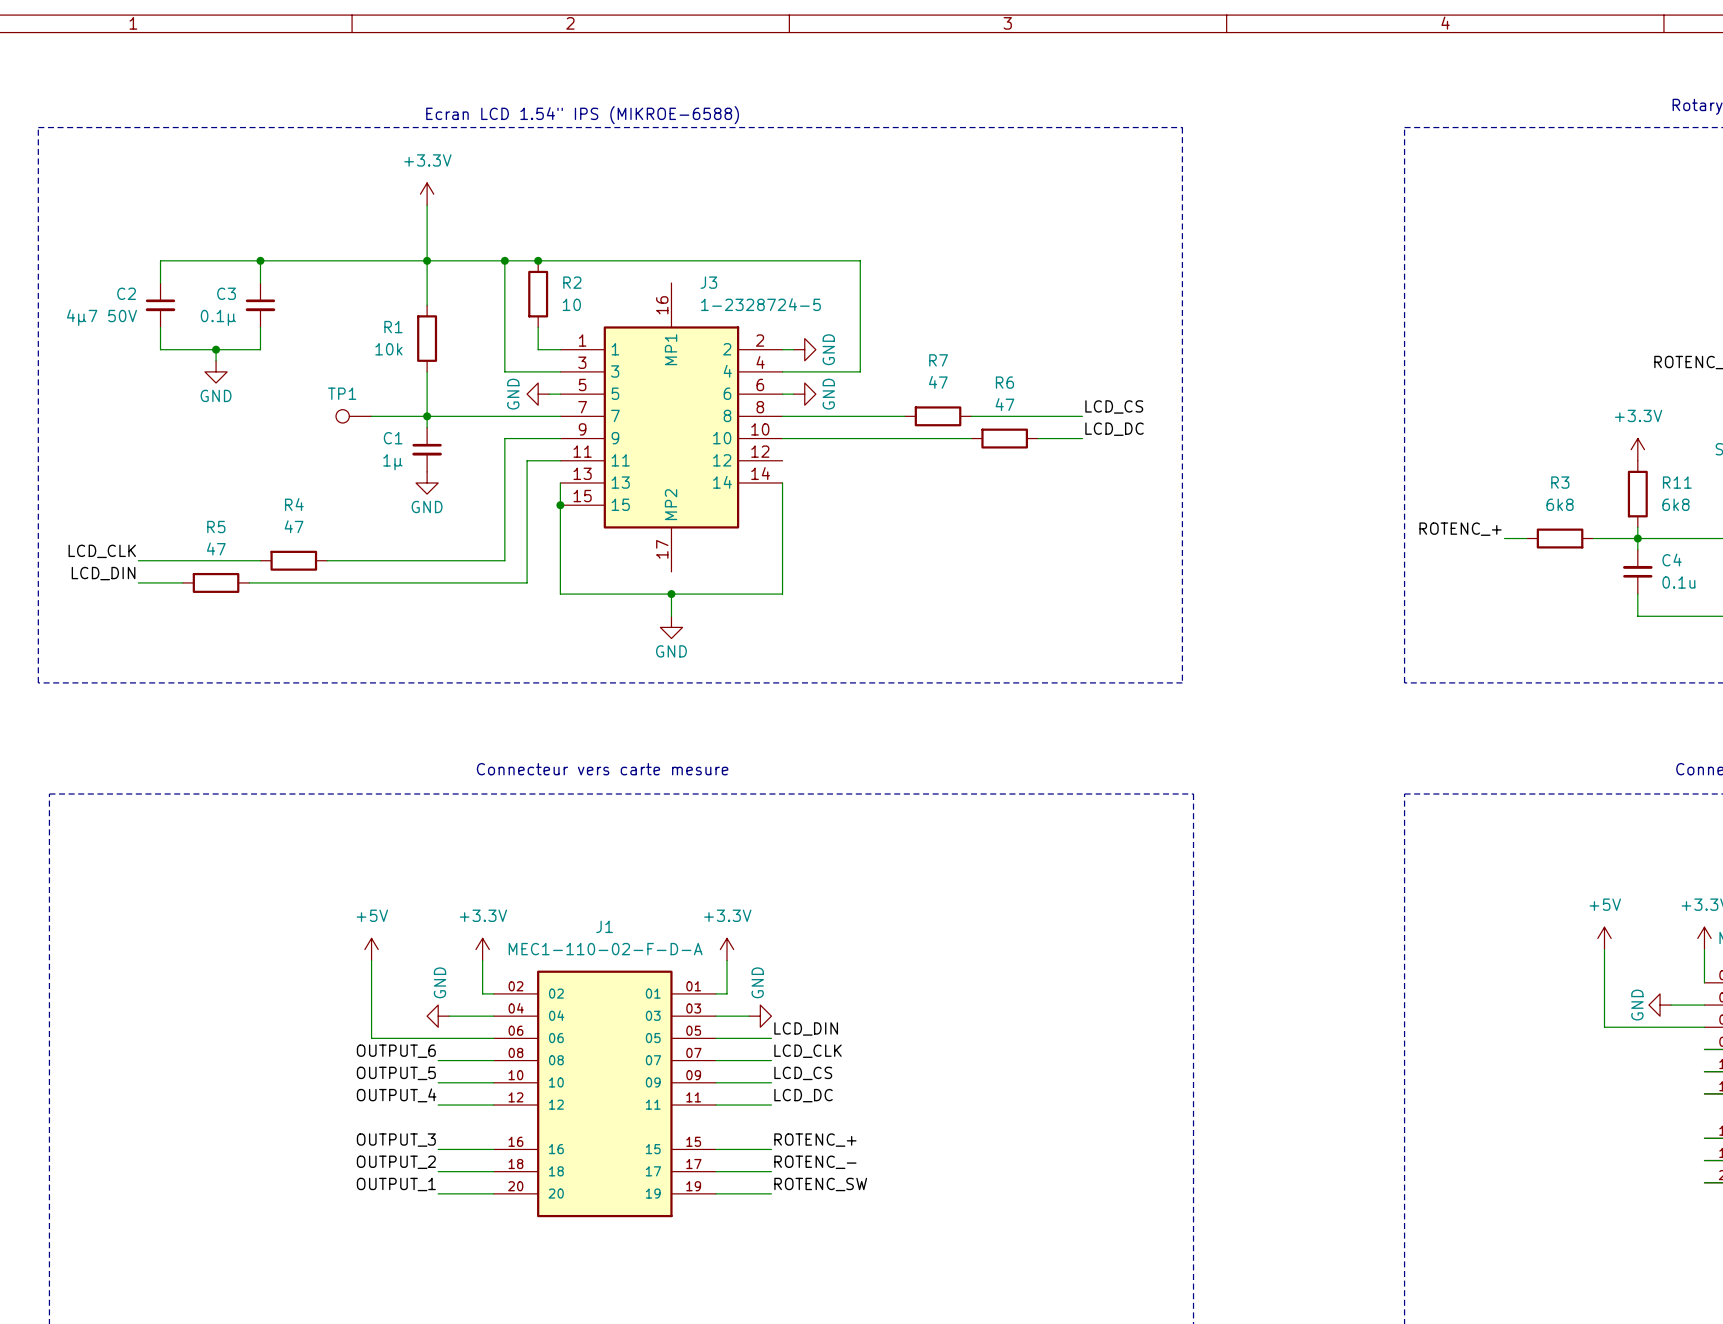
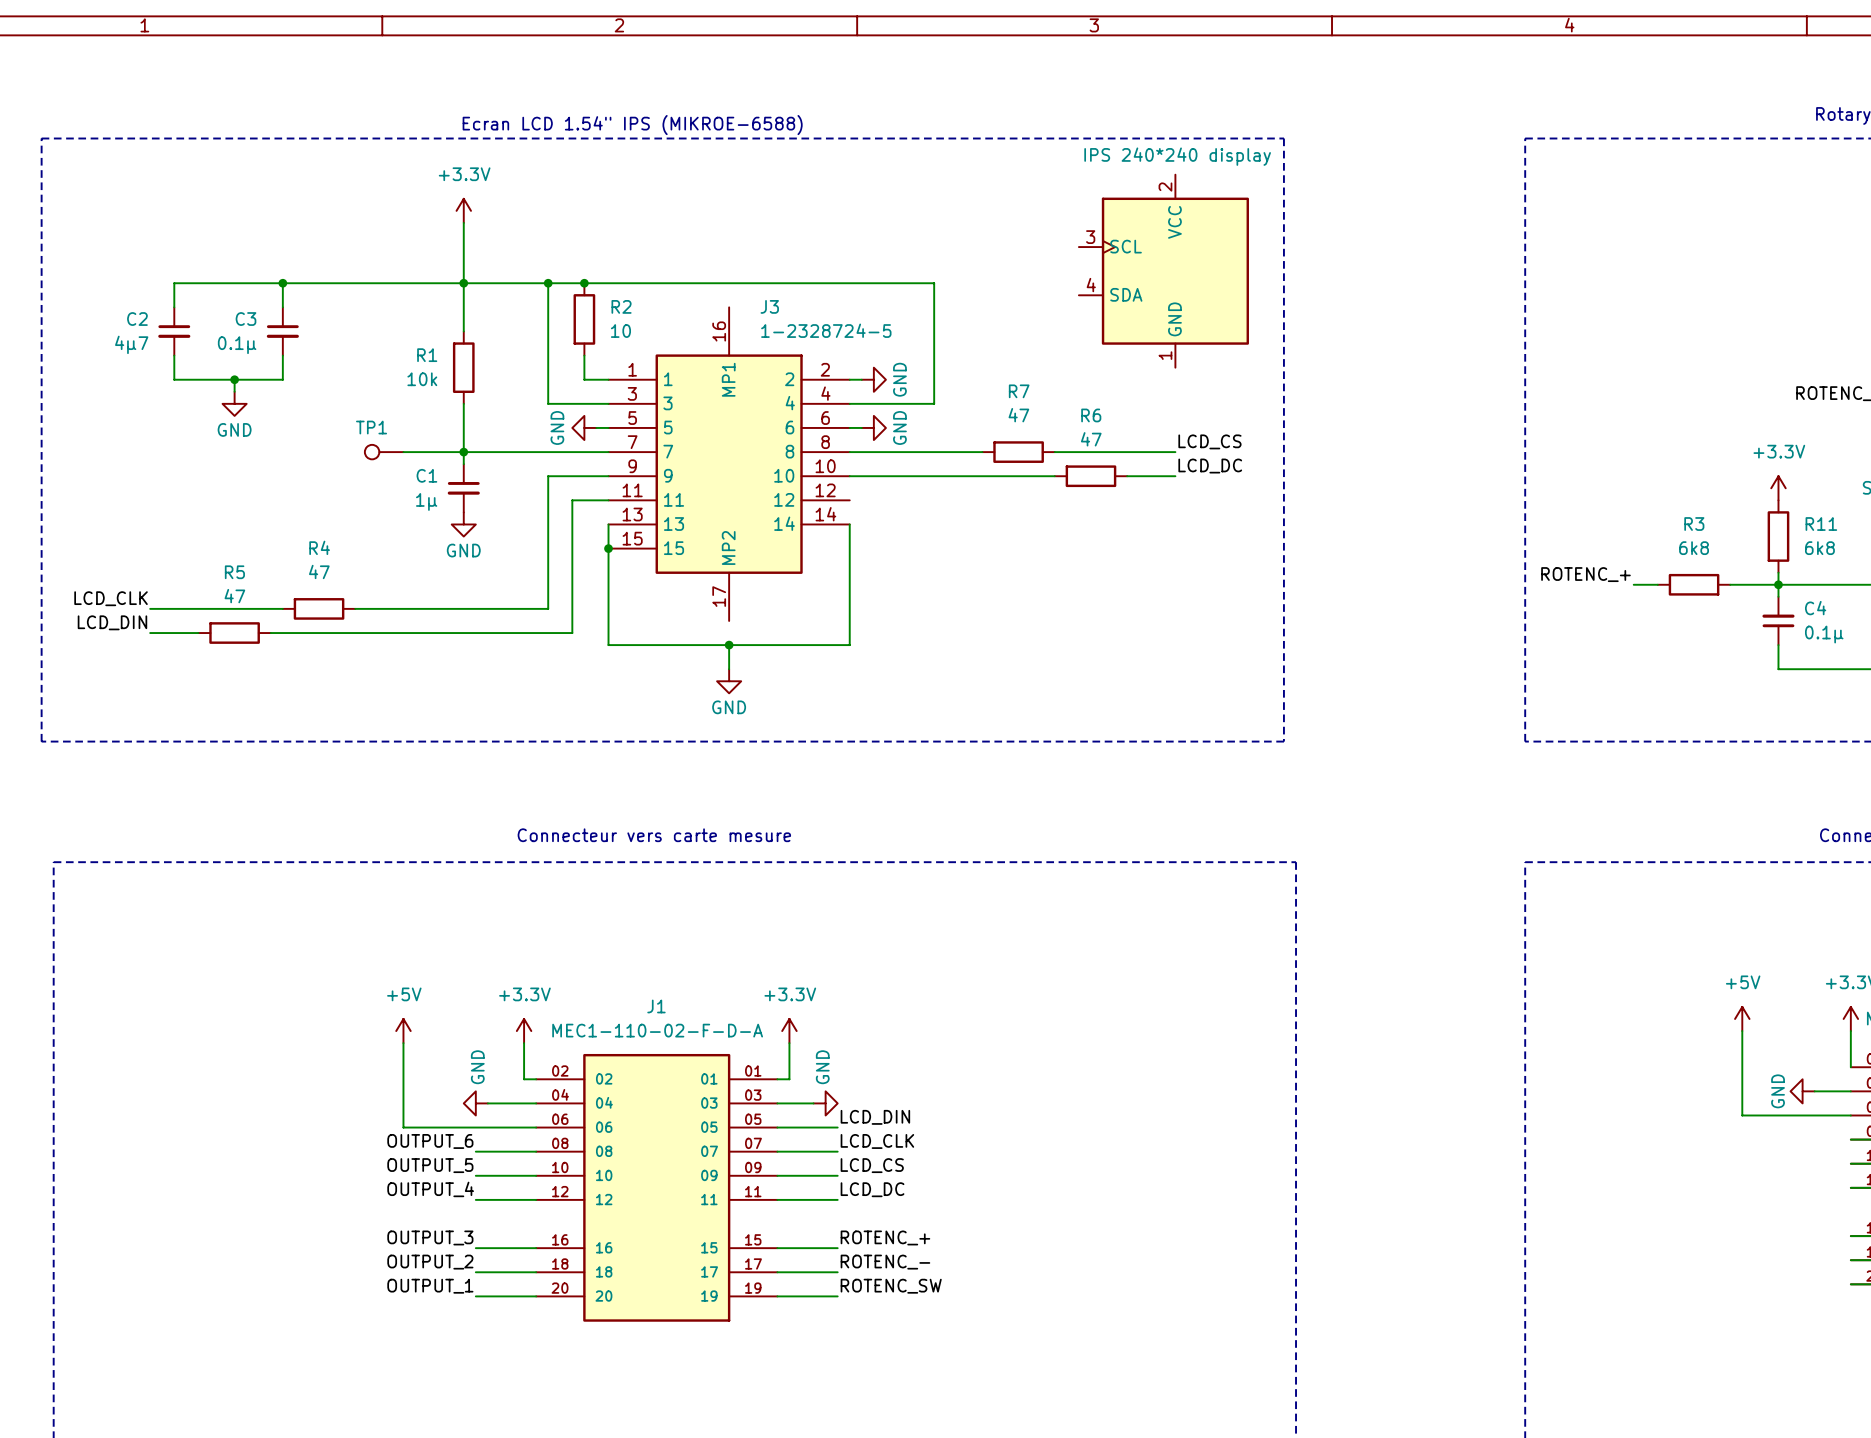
part: none -> IPS 240*240 display (1163, 271)
C2 value: 4µ7 50V (101, 317) -> 4µ7 (131, 344)
C4 value: 0.1u (1678, 582) -> 0.1µ (1824, 634)

